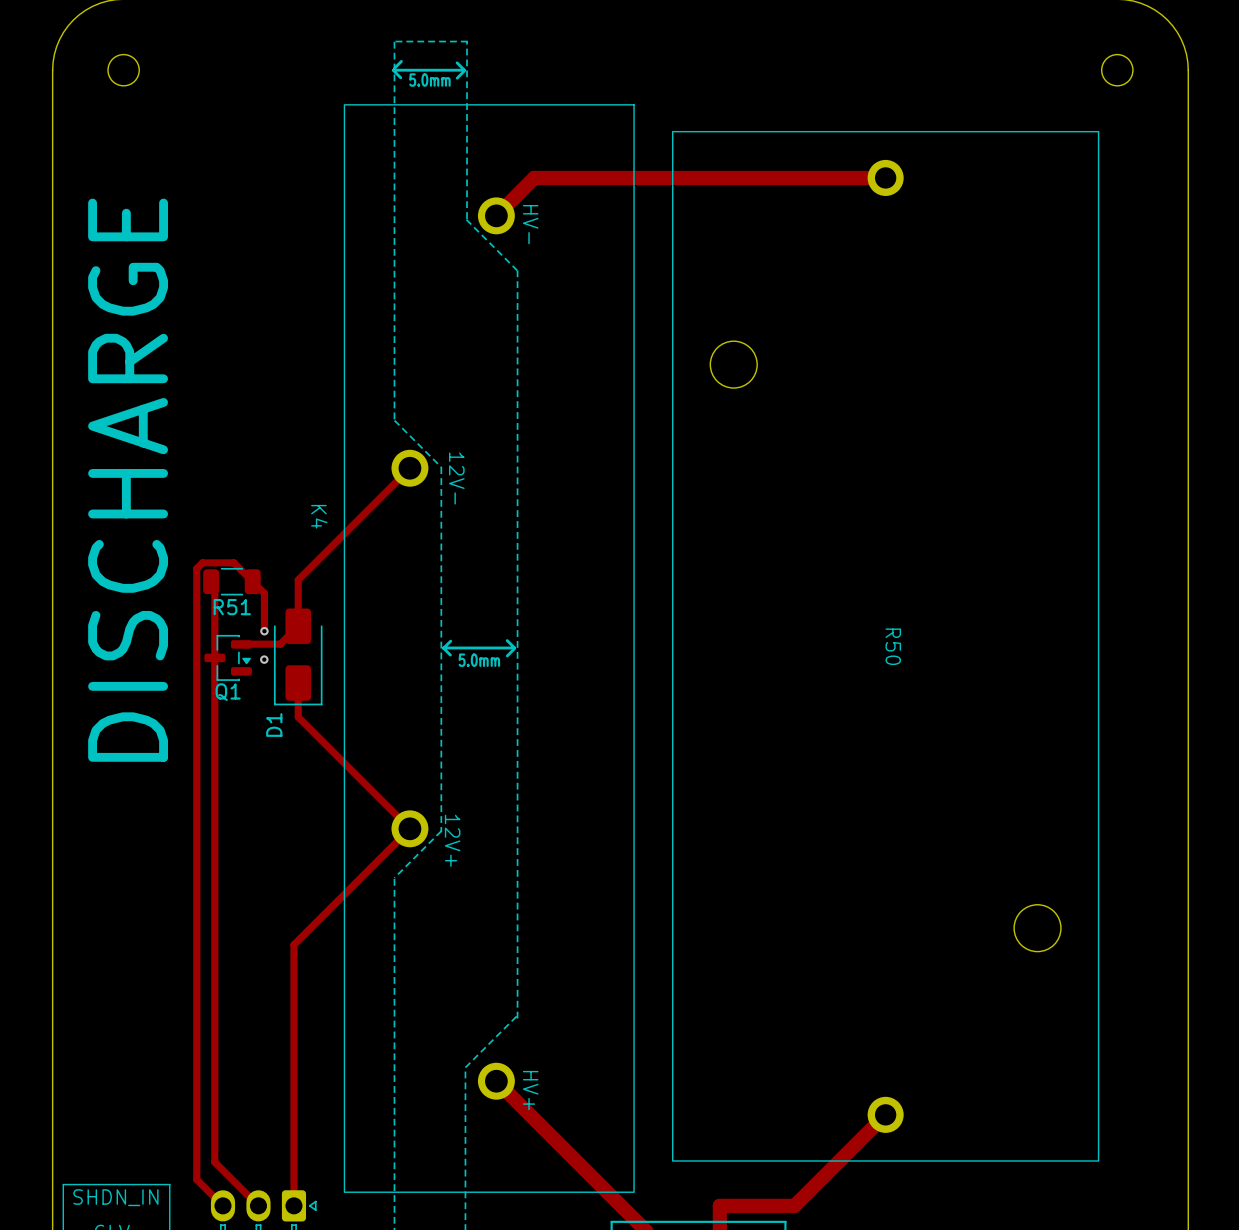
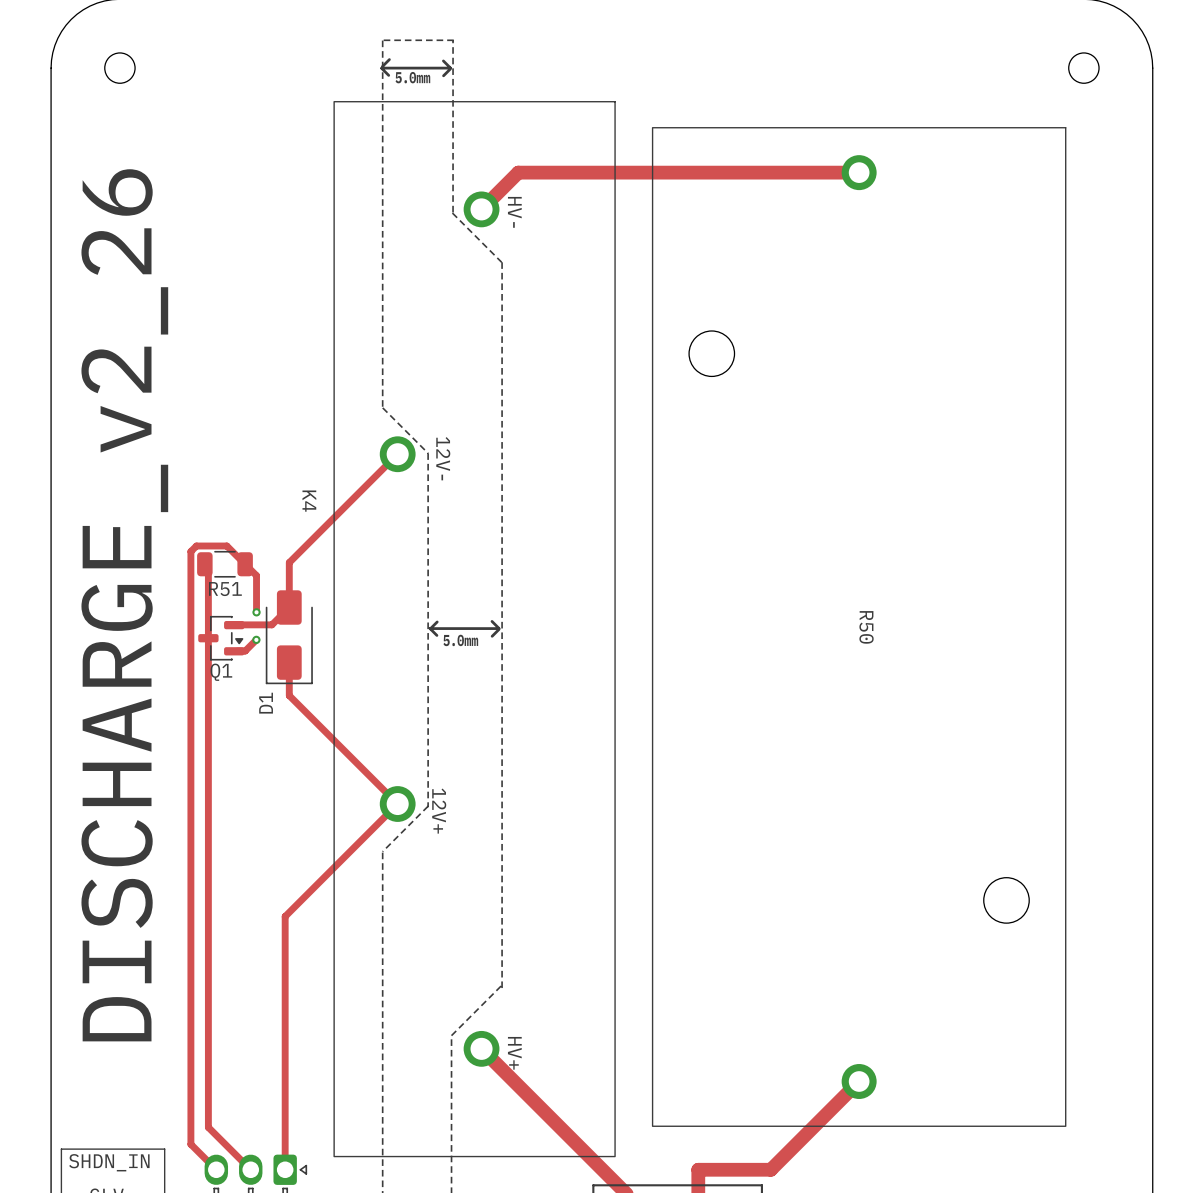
text: DISCHARGE (128, 480) -> DISCHARGE_v2_26 (124, 605)
track: none -> (256, 639) (245, 651) (237, 651)

